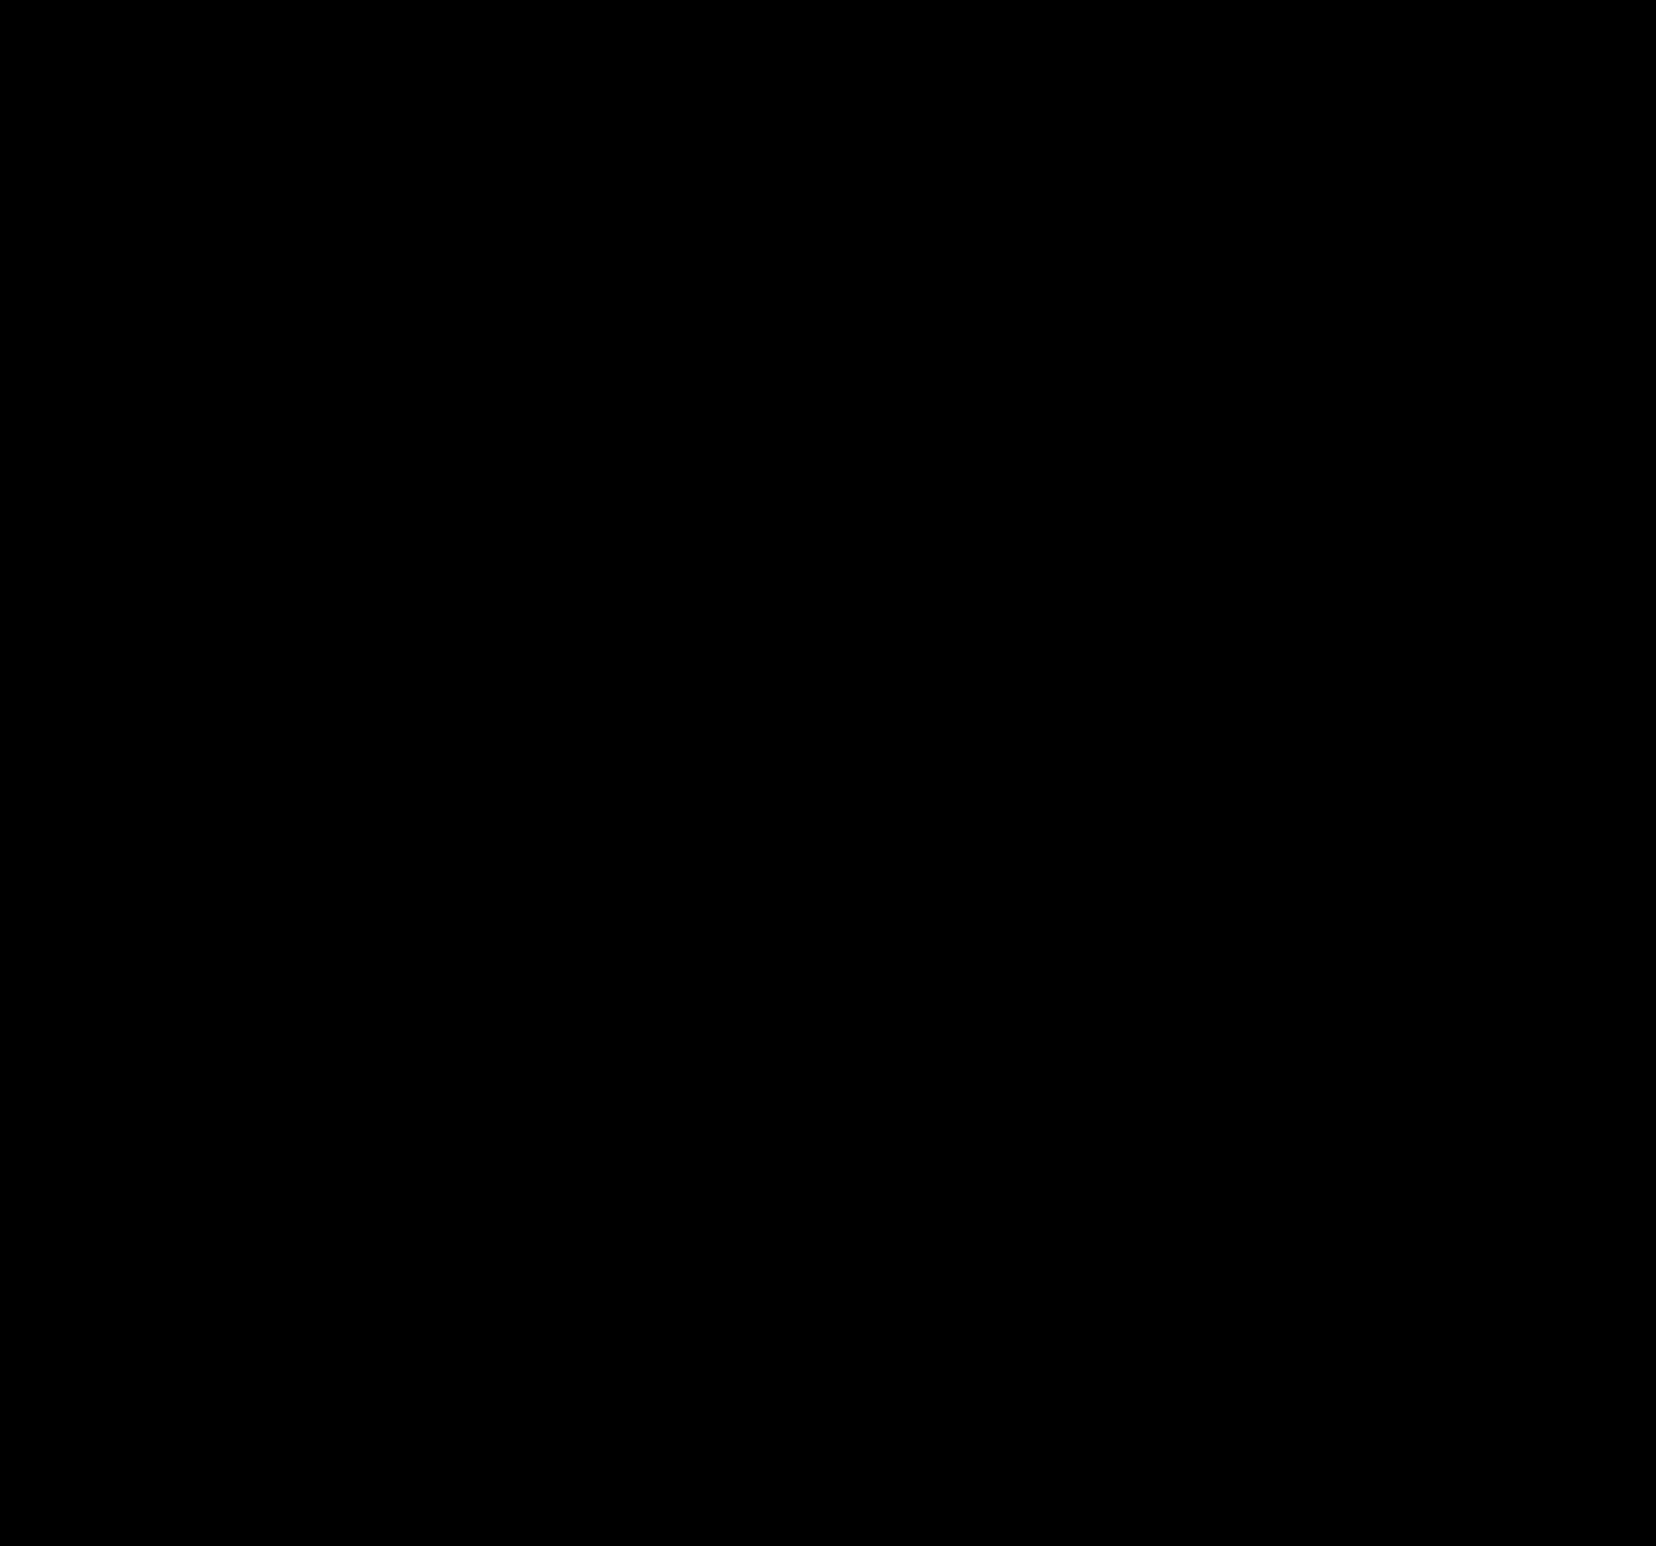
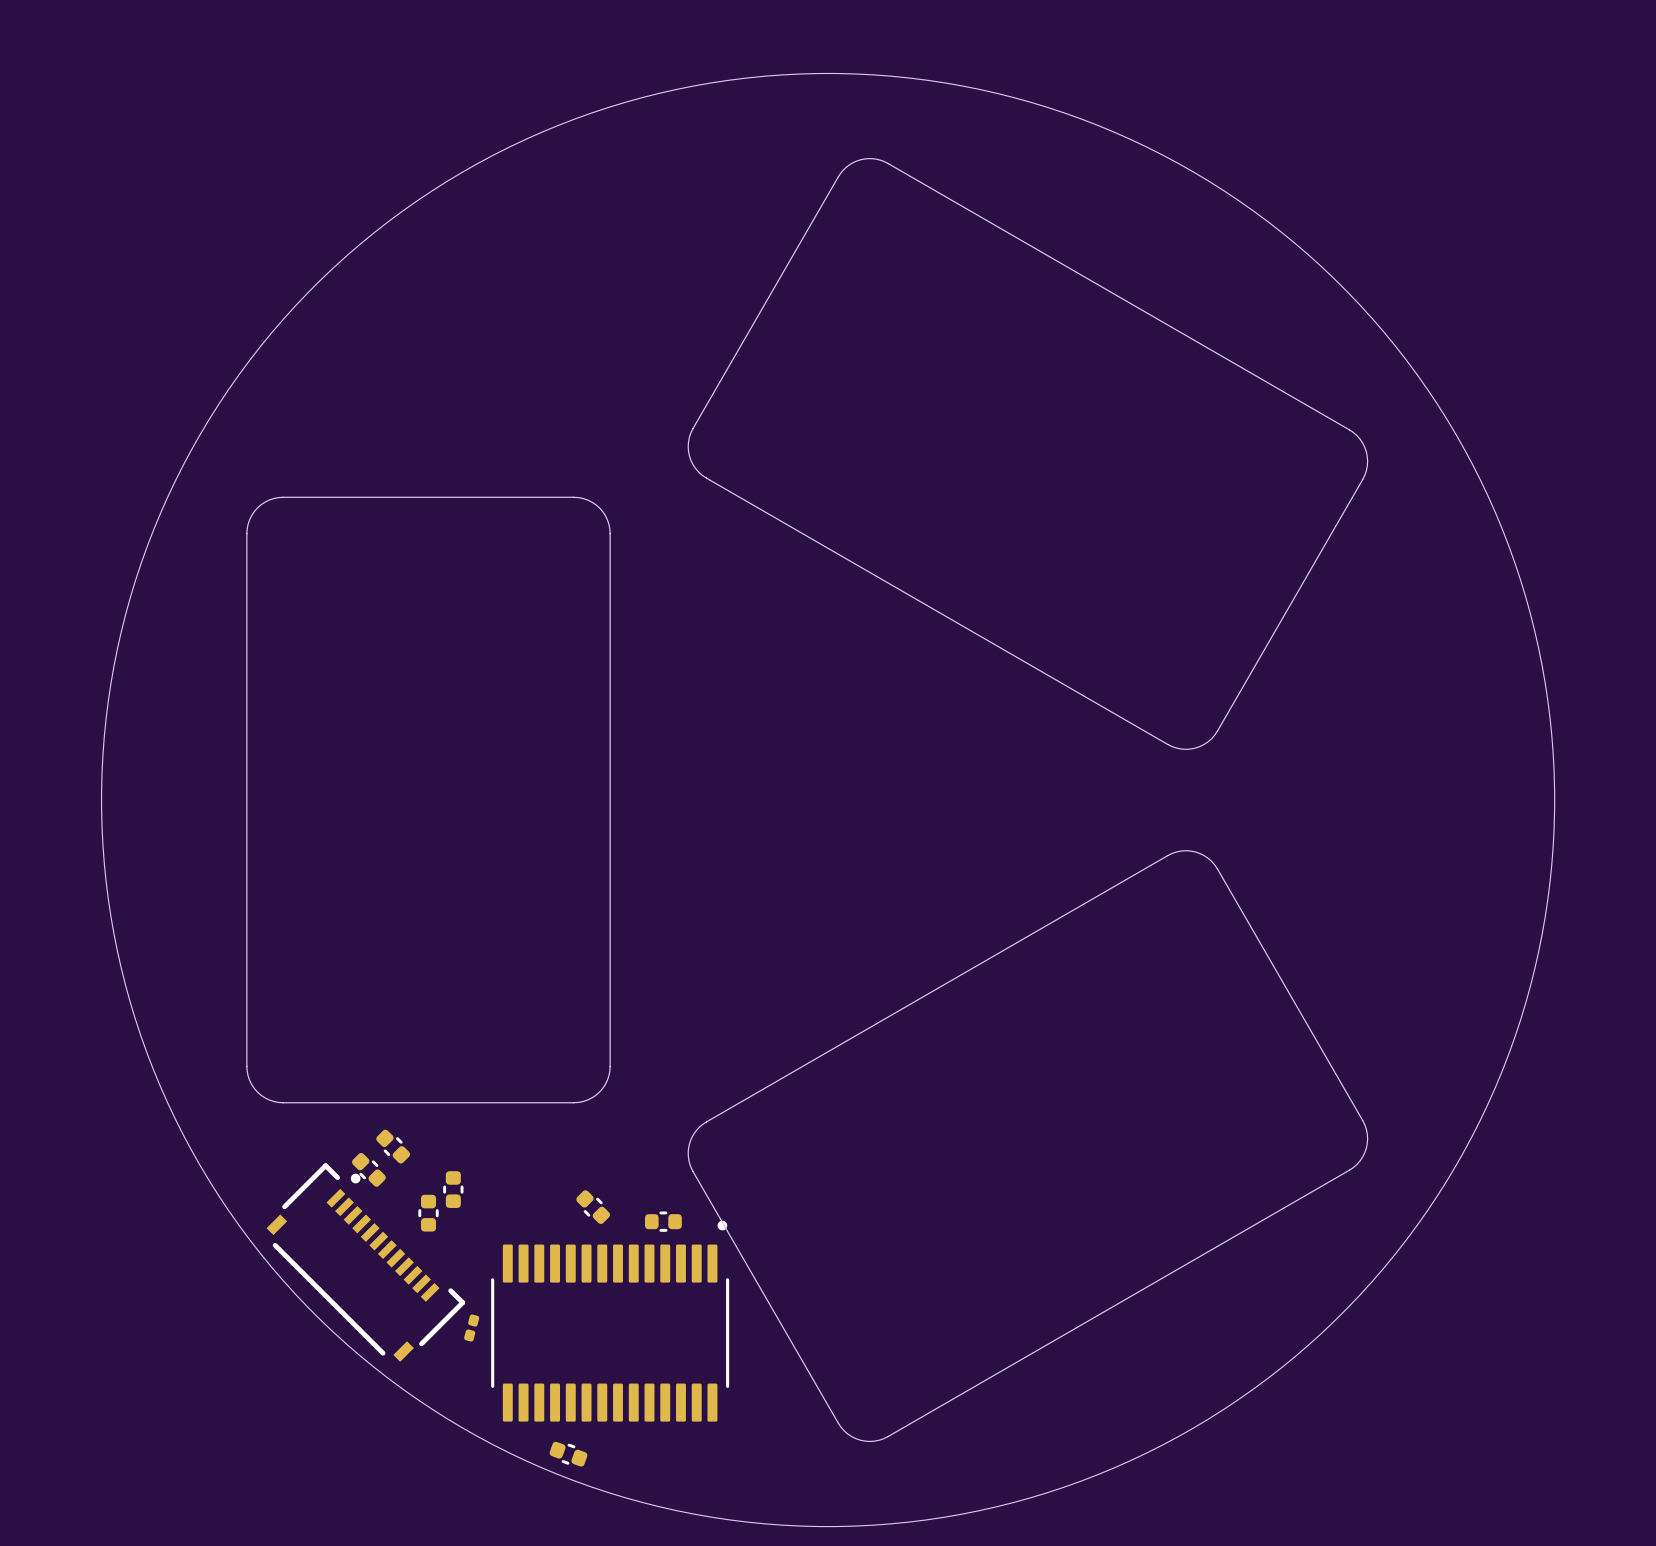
round board edge: none -> [101, 73, 1555, 1527]
board edge: none -> (888, 163) (1349, 429) (1362, 443) (1367, 461) (1362, 479) (1217, 731) (1204, 744) (1185, 749) (1167, 744) (706, 478) (693, 464) (688, 446) (693, 428) (838, 176) (846, 167) (860, 159) (876, 159) (888, 163)
board edge: none -> (573, 497) (283, 497) (265, 502) (251, 515) (246, 533) (246, 1066) (251, 1084) (265, 1097) (283, 1102) (573, 1102) (591, 1097) (605, 1084) (610, 1066) (610, 533) (607, 519) (599, 507) (587, 500) (573, 497)
board edge: none -> (1167, 855) (706, 1121) (692, 1136) (688, 1156) (693, 1171) (838, 1423) (851, 1436) (869, 1441) (888, 1436) (1349, 1170) (1362, 1156) (1367, 1138) (1362, 1120) (1217, 868) (1208, 858) (1195, 851) (1181, 851) (1167, 855)
part: none -> (393, 1146)
part: none -> (368, 1169)
part: none -> (453, 1189)
part: none -> (593, 1207)
part: none -> (428, 1213)
part: none -> (663, 1221)
part: none -> (365, 1262)
part: none -> (610, 1321)
part: none -> (471, 1328)
part: none -> (568, 1454)

